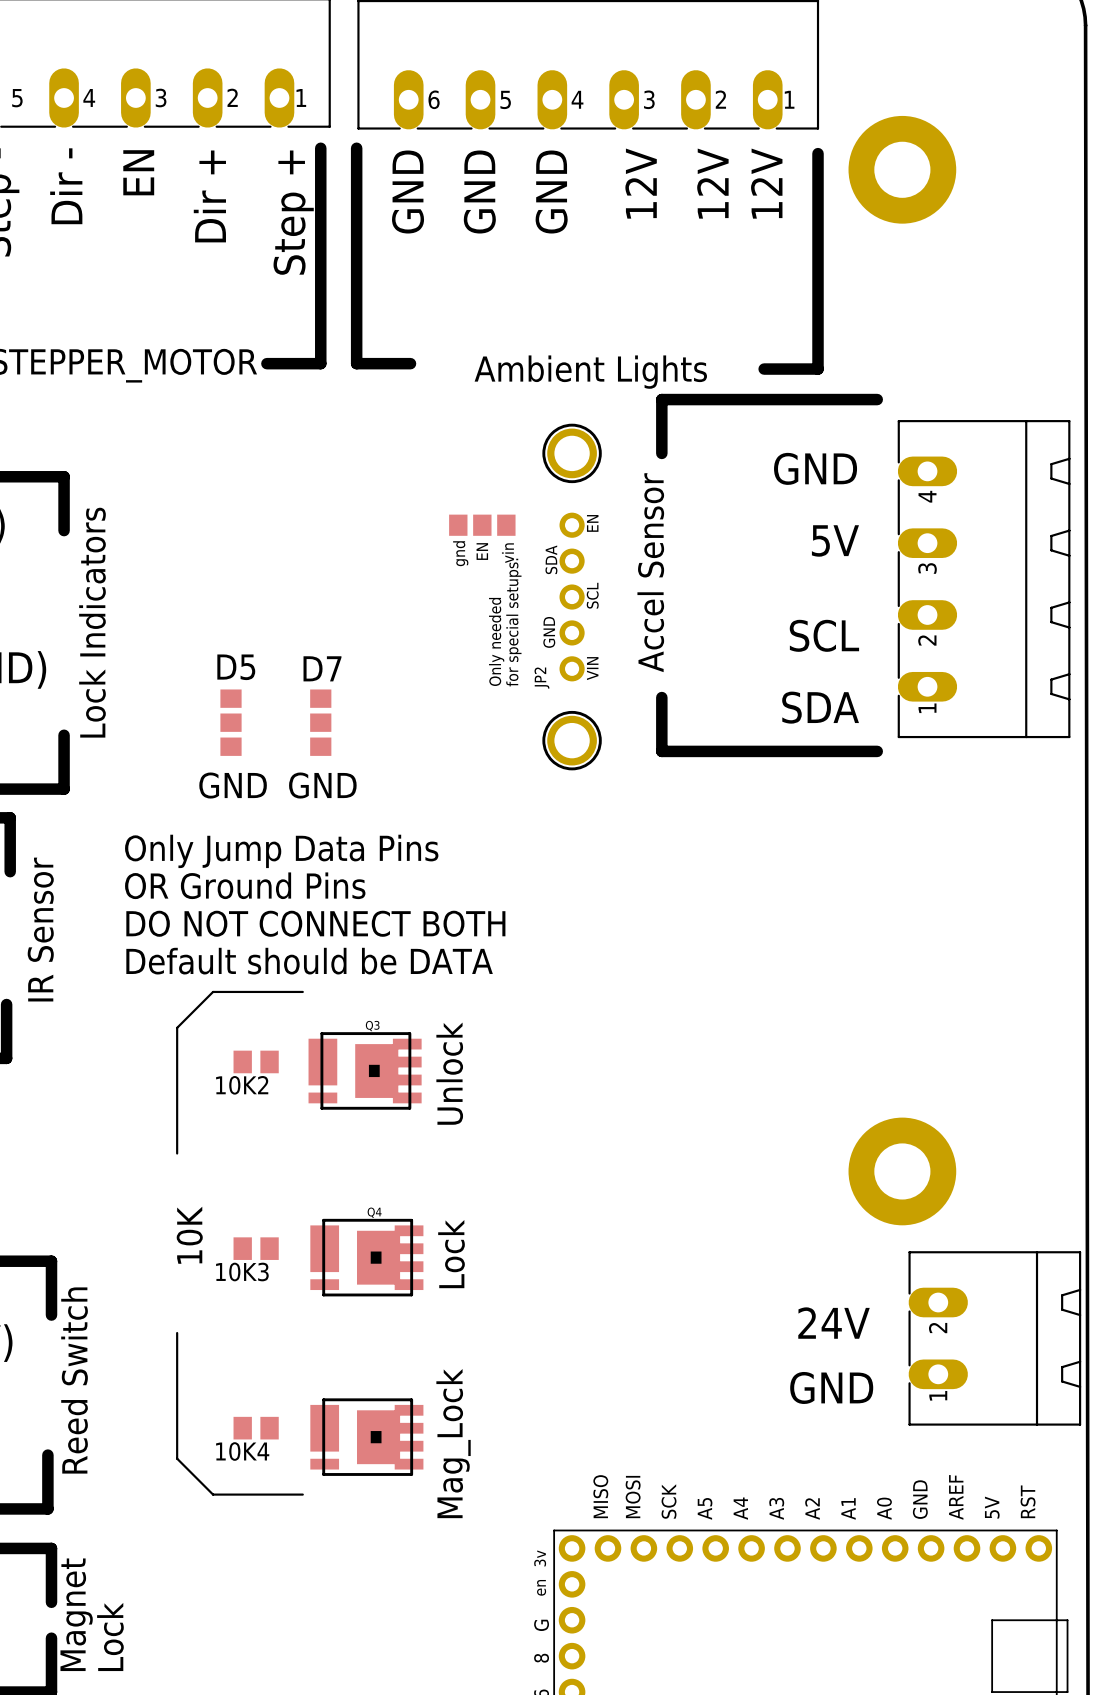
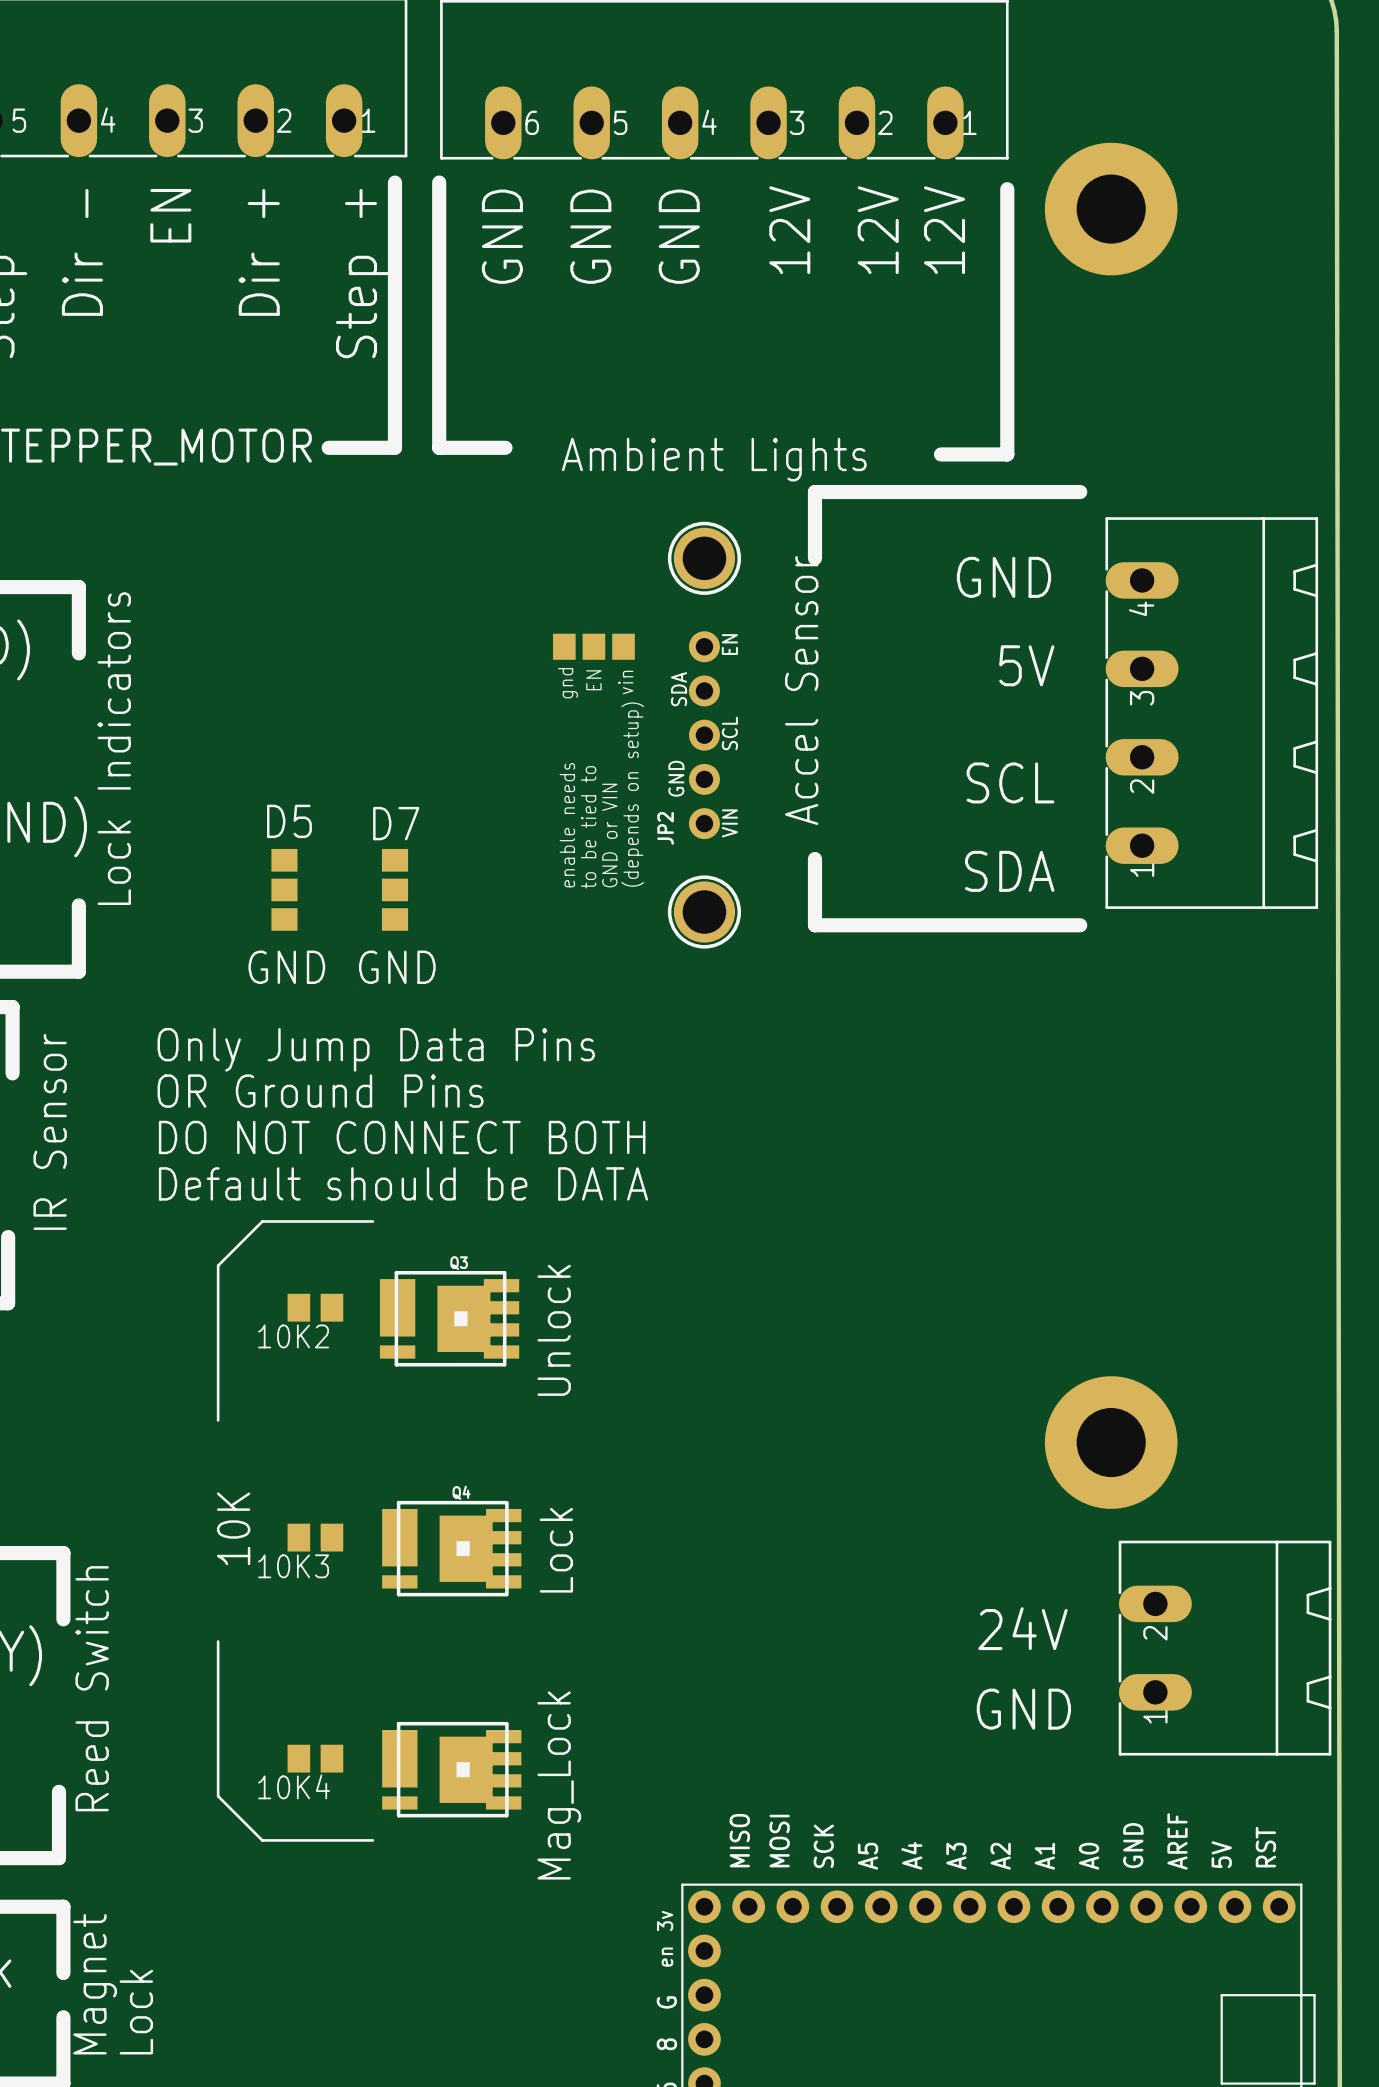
text: for special setups. (513, 622) -> none
text: Only needed (496, 641) -> none
text: none -> (depends on setup) (632, 794)
text: none -> enable needs (567, 825)
text: none -> to be tied to (588, 827)
text: none -> GND or VIN (609, 835)

